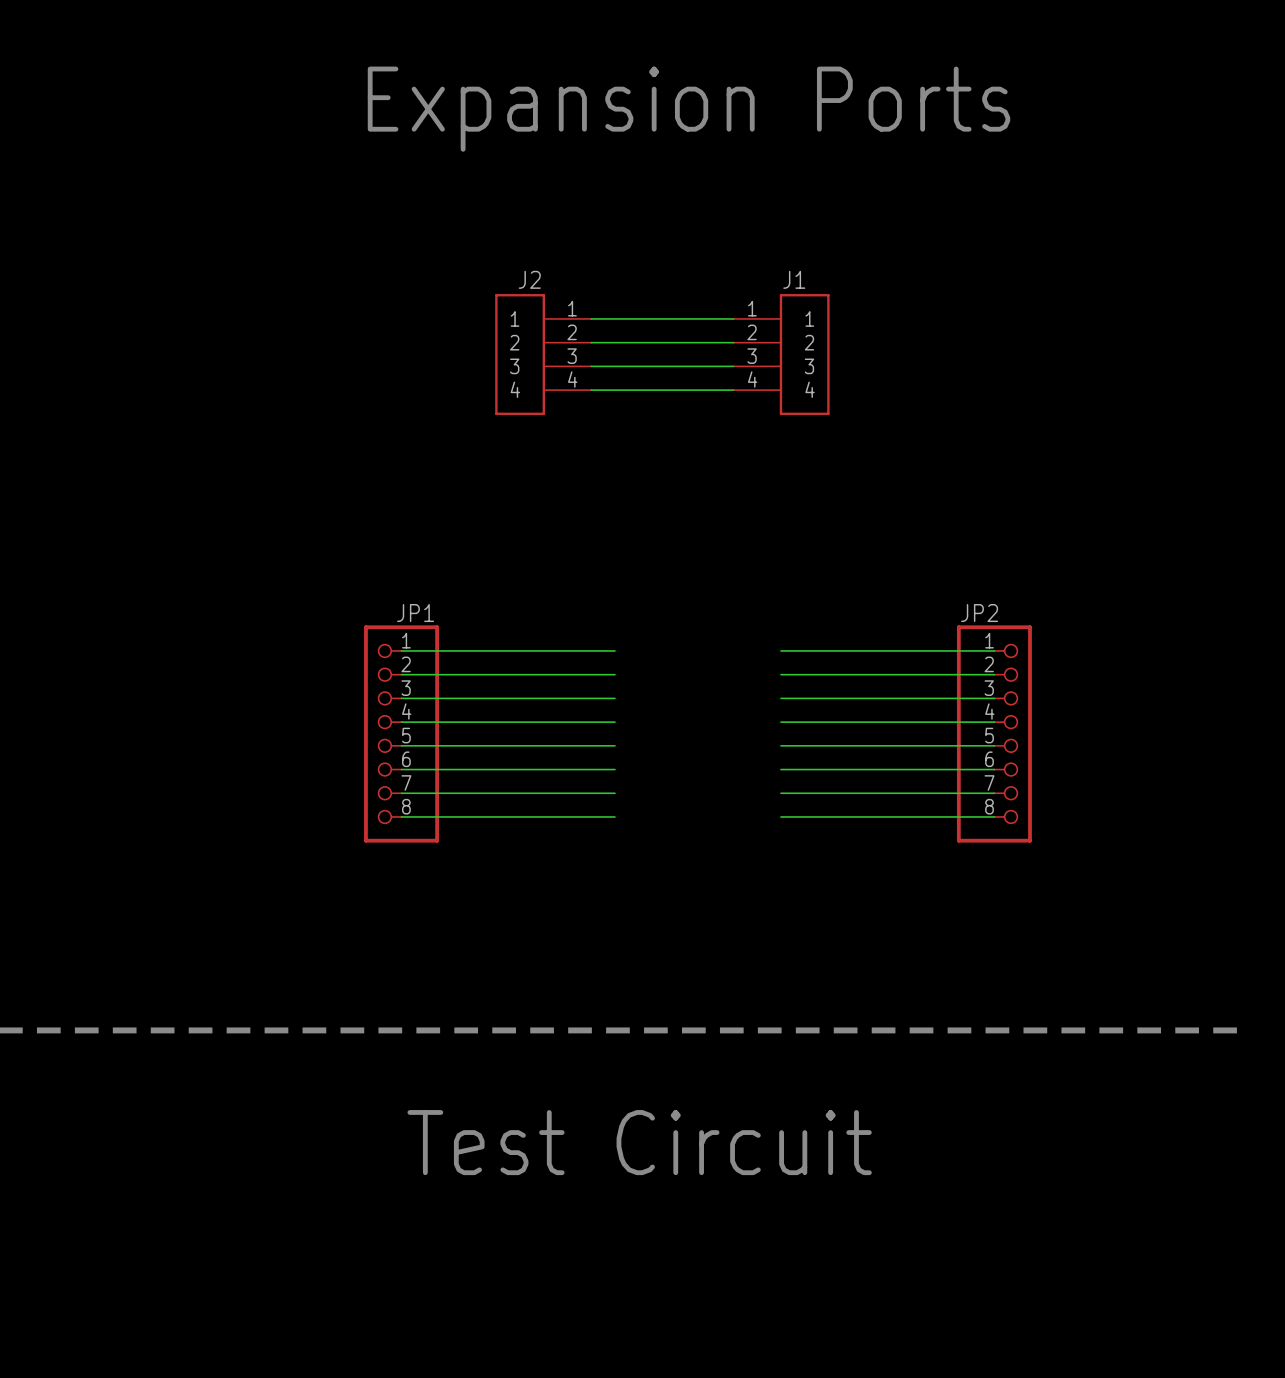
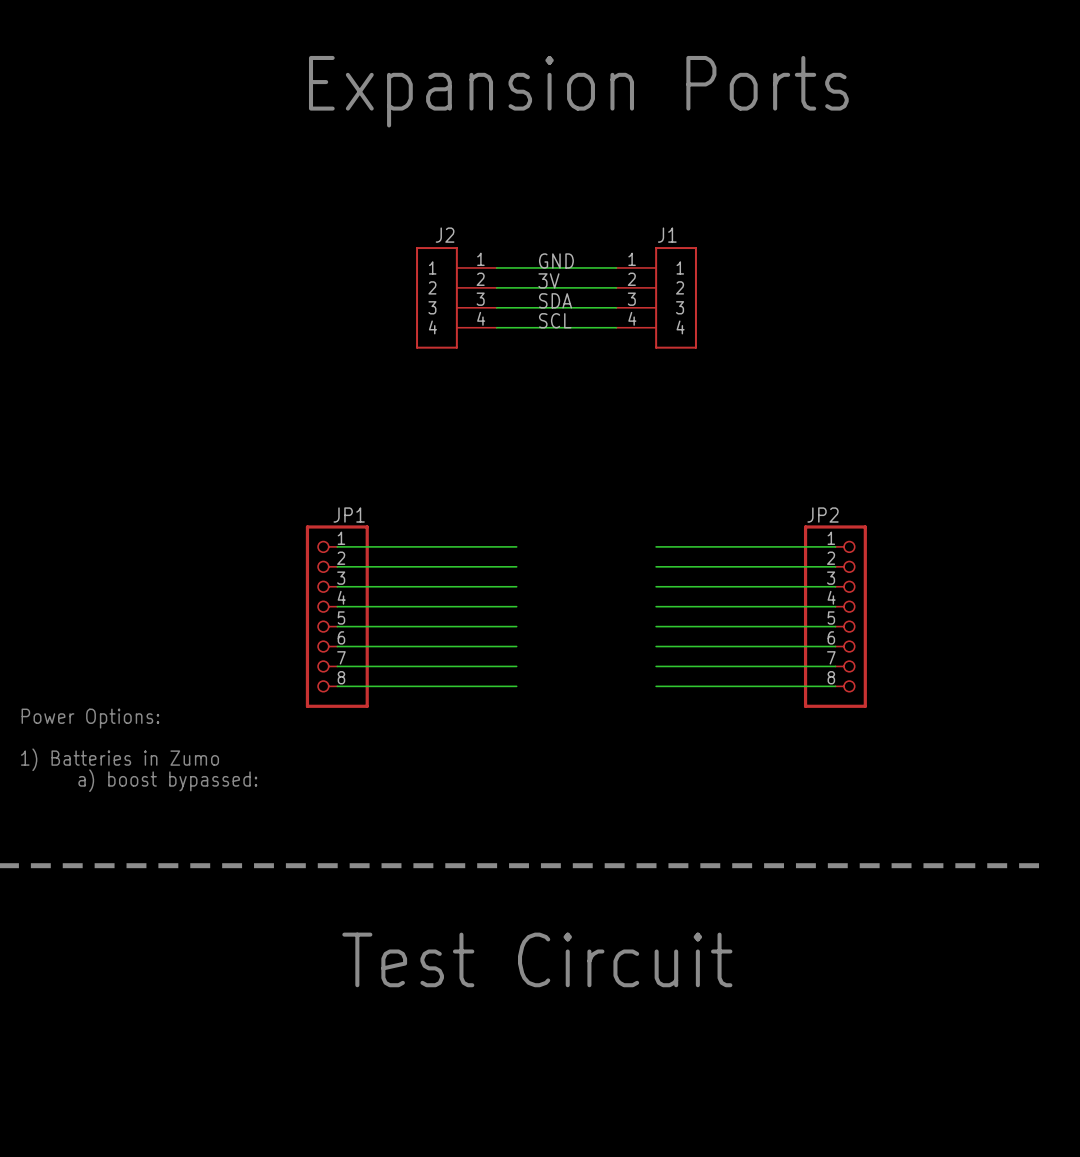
label: none -> GND (556, 260)
label: none -> 3V (548, 280)
label: none -> SDA (555, 300)
label: none -> SCL (555, 320)
text: none -> Power Options: (90, 718)
text: none -> 1) Batteries in Zumo (120, 759)
text: none -> a) boost bypassed: (167, 780)

